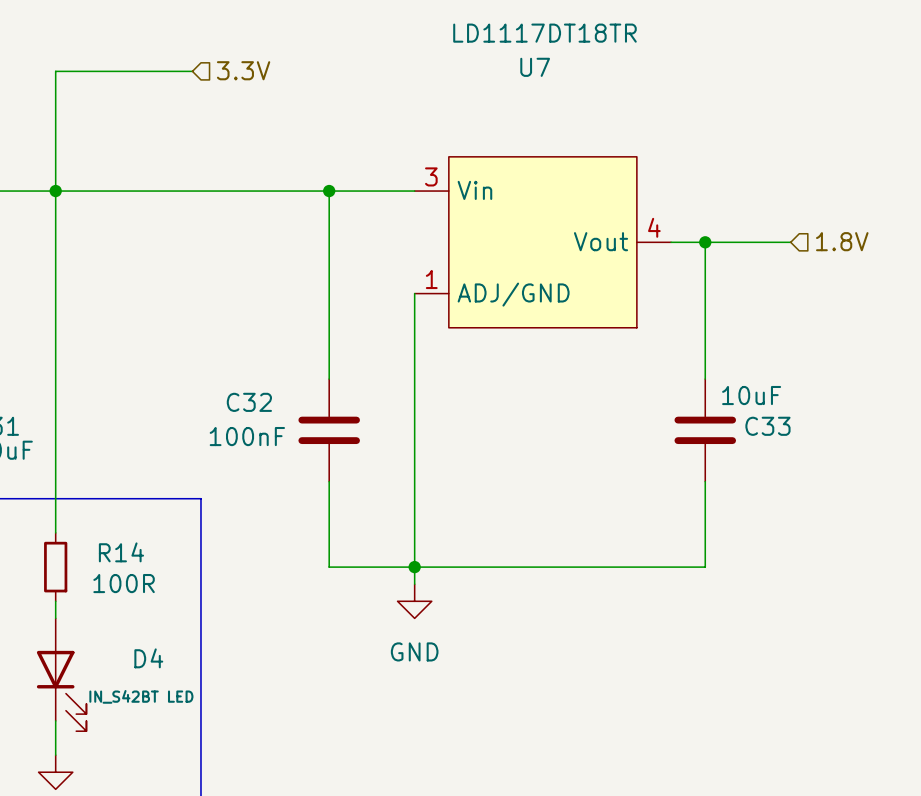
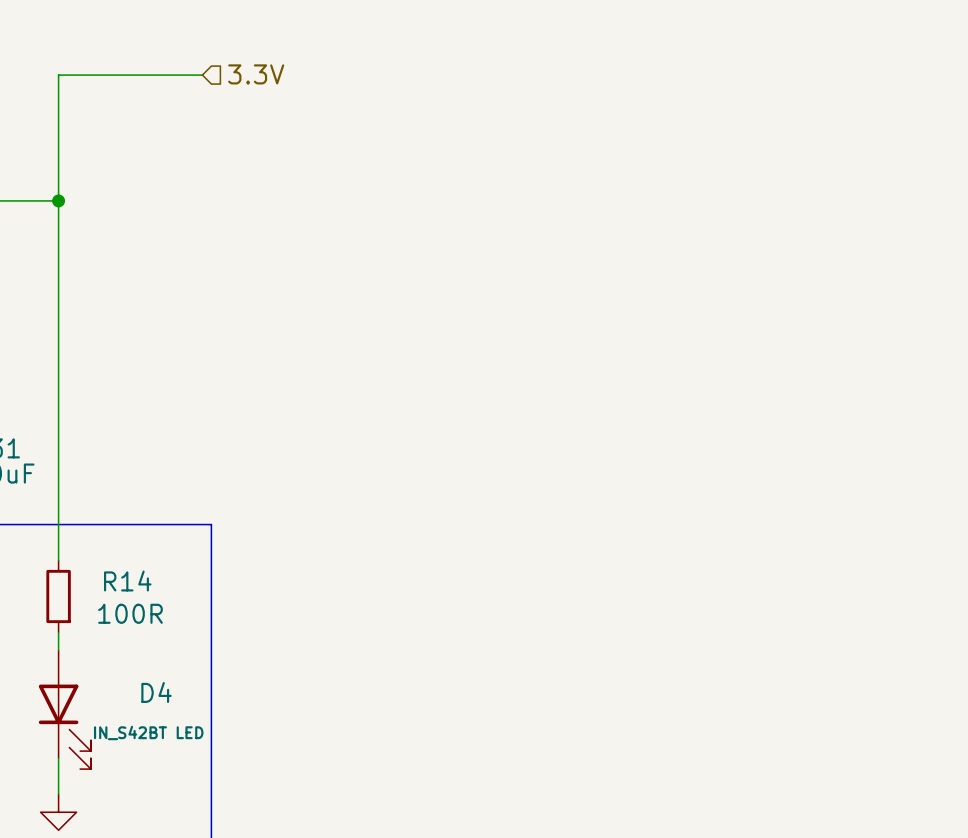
wire: (55, 191) (414, 191) -> none
wire: (329, 191) (329, 379) -> none
junction: (329, 191) -> none
hierarchical label: 1.8V (842, 241) -> none
U7: LD1117DT18TR (542, 242) -> none
wire: (671, 242) (790, 242) -> none
wire: (705, 242) (705, 379) -> none
junction: (705, 242) -> none
wire: (414, 293) (414, 584) -> none
C32: 100nF (329, 430) -> none
C33: 10uF (705, 430) -> none
wire: (329, 481) (329, 567) (705, 567) (705, 481) -> none
junction: (414, 567) -> none
power symbol: GND (414, 601) -> none

